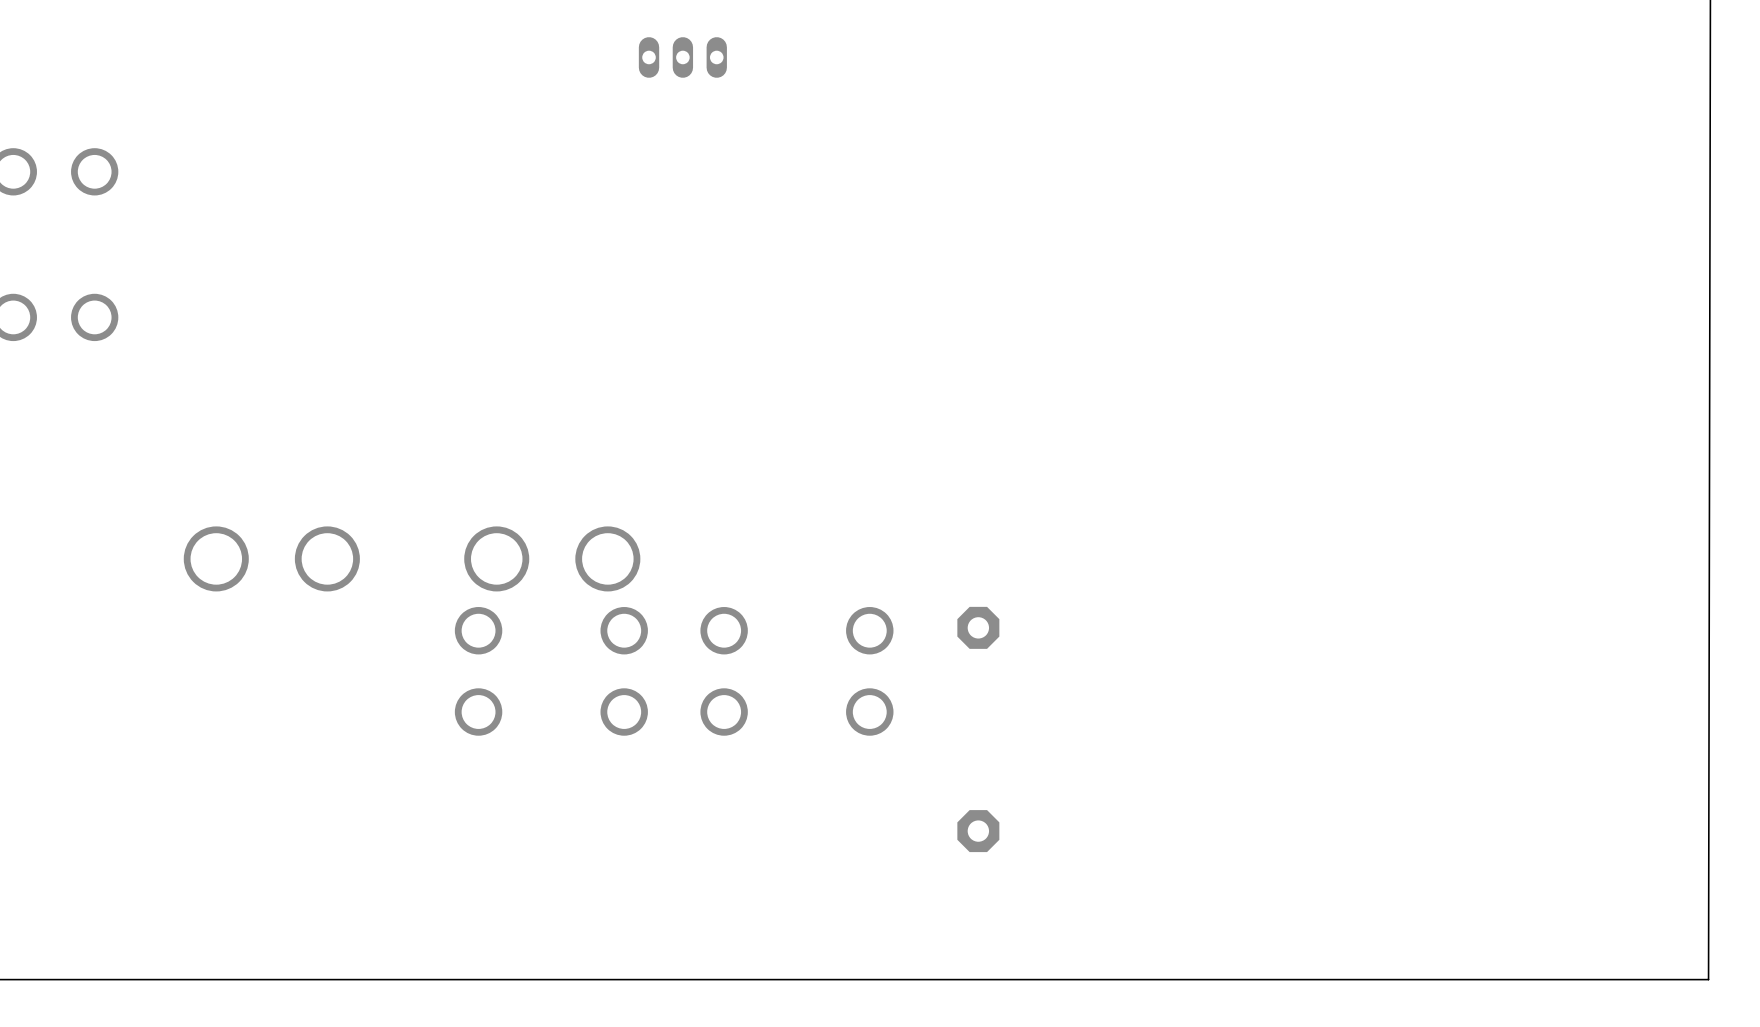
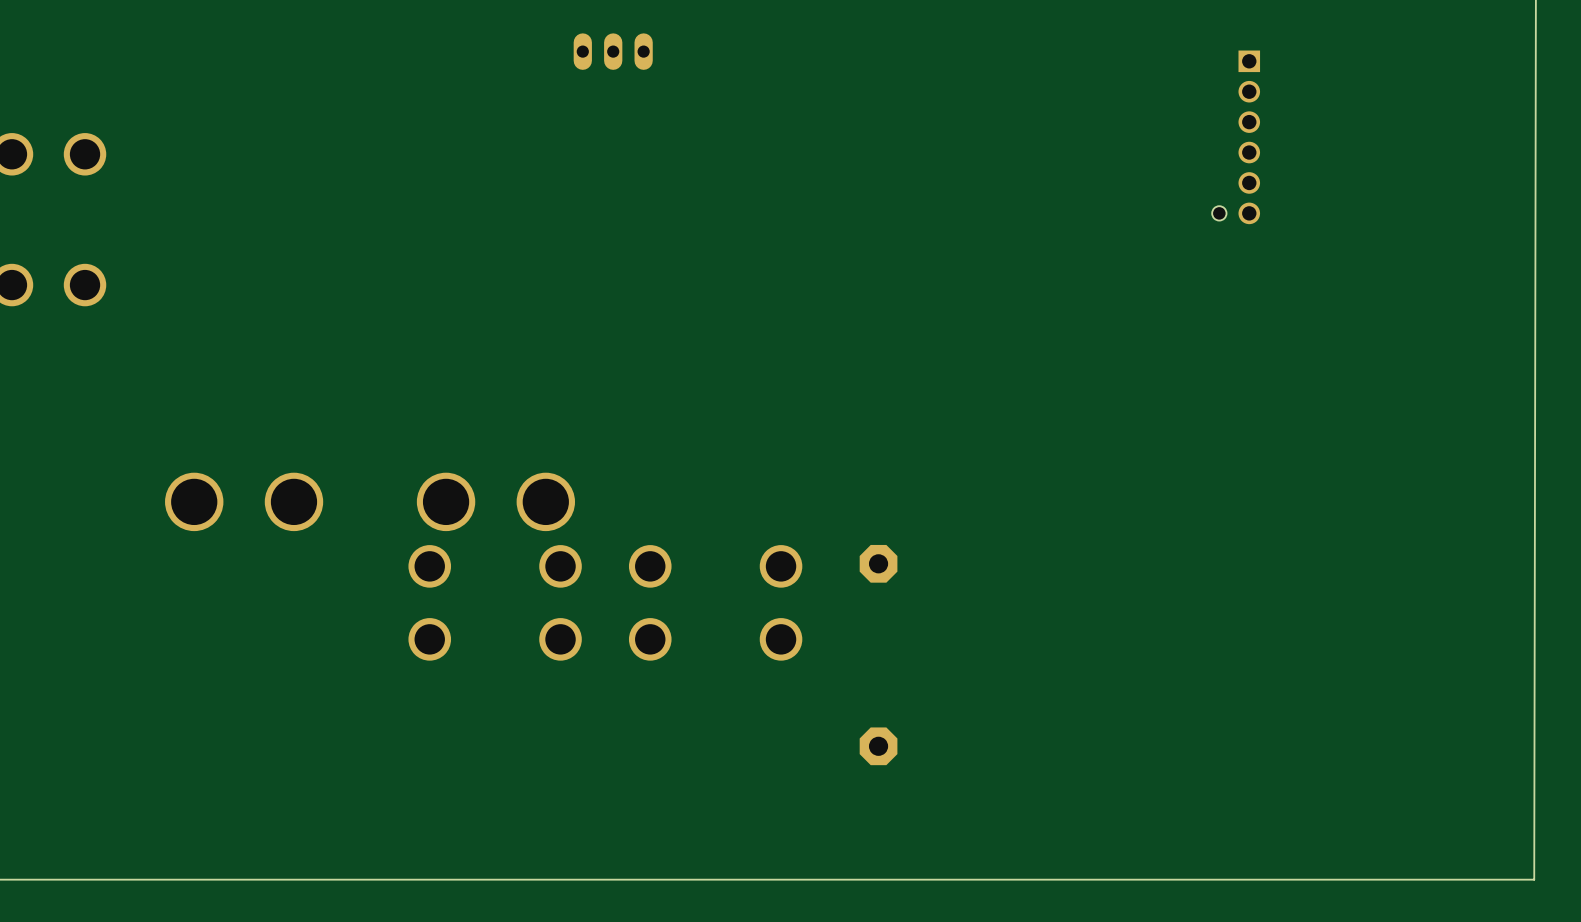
part: none -> (1236, 137)

